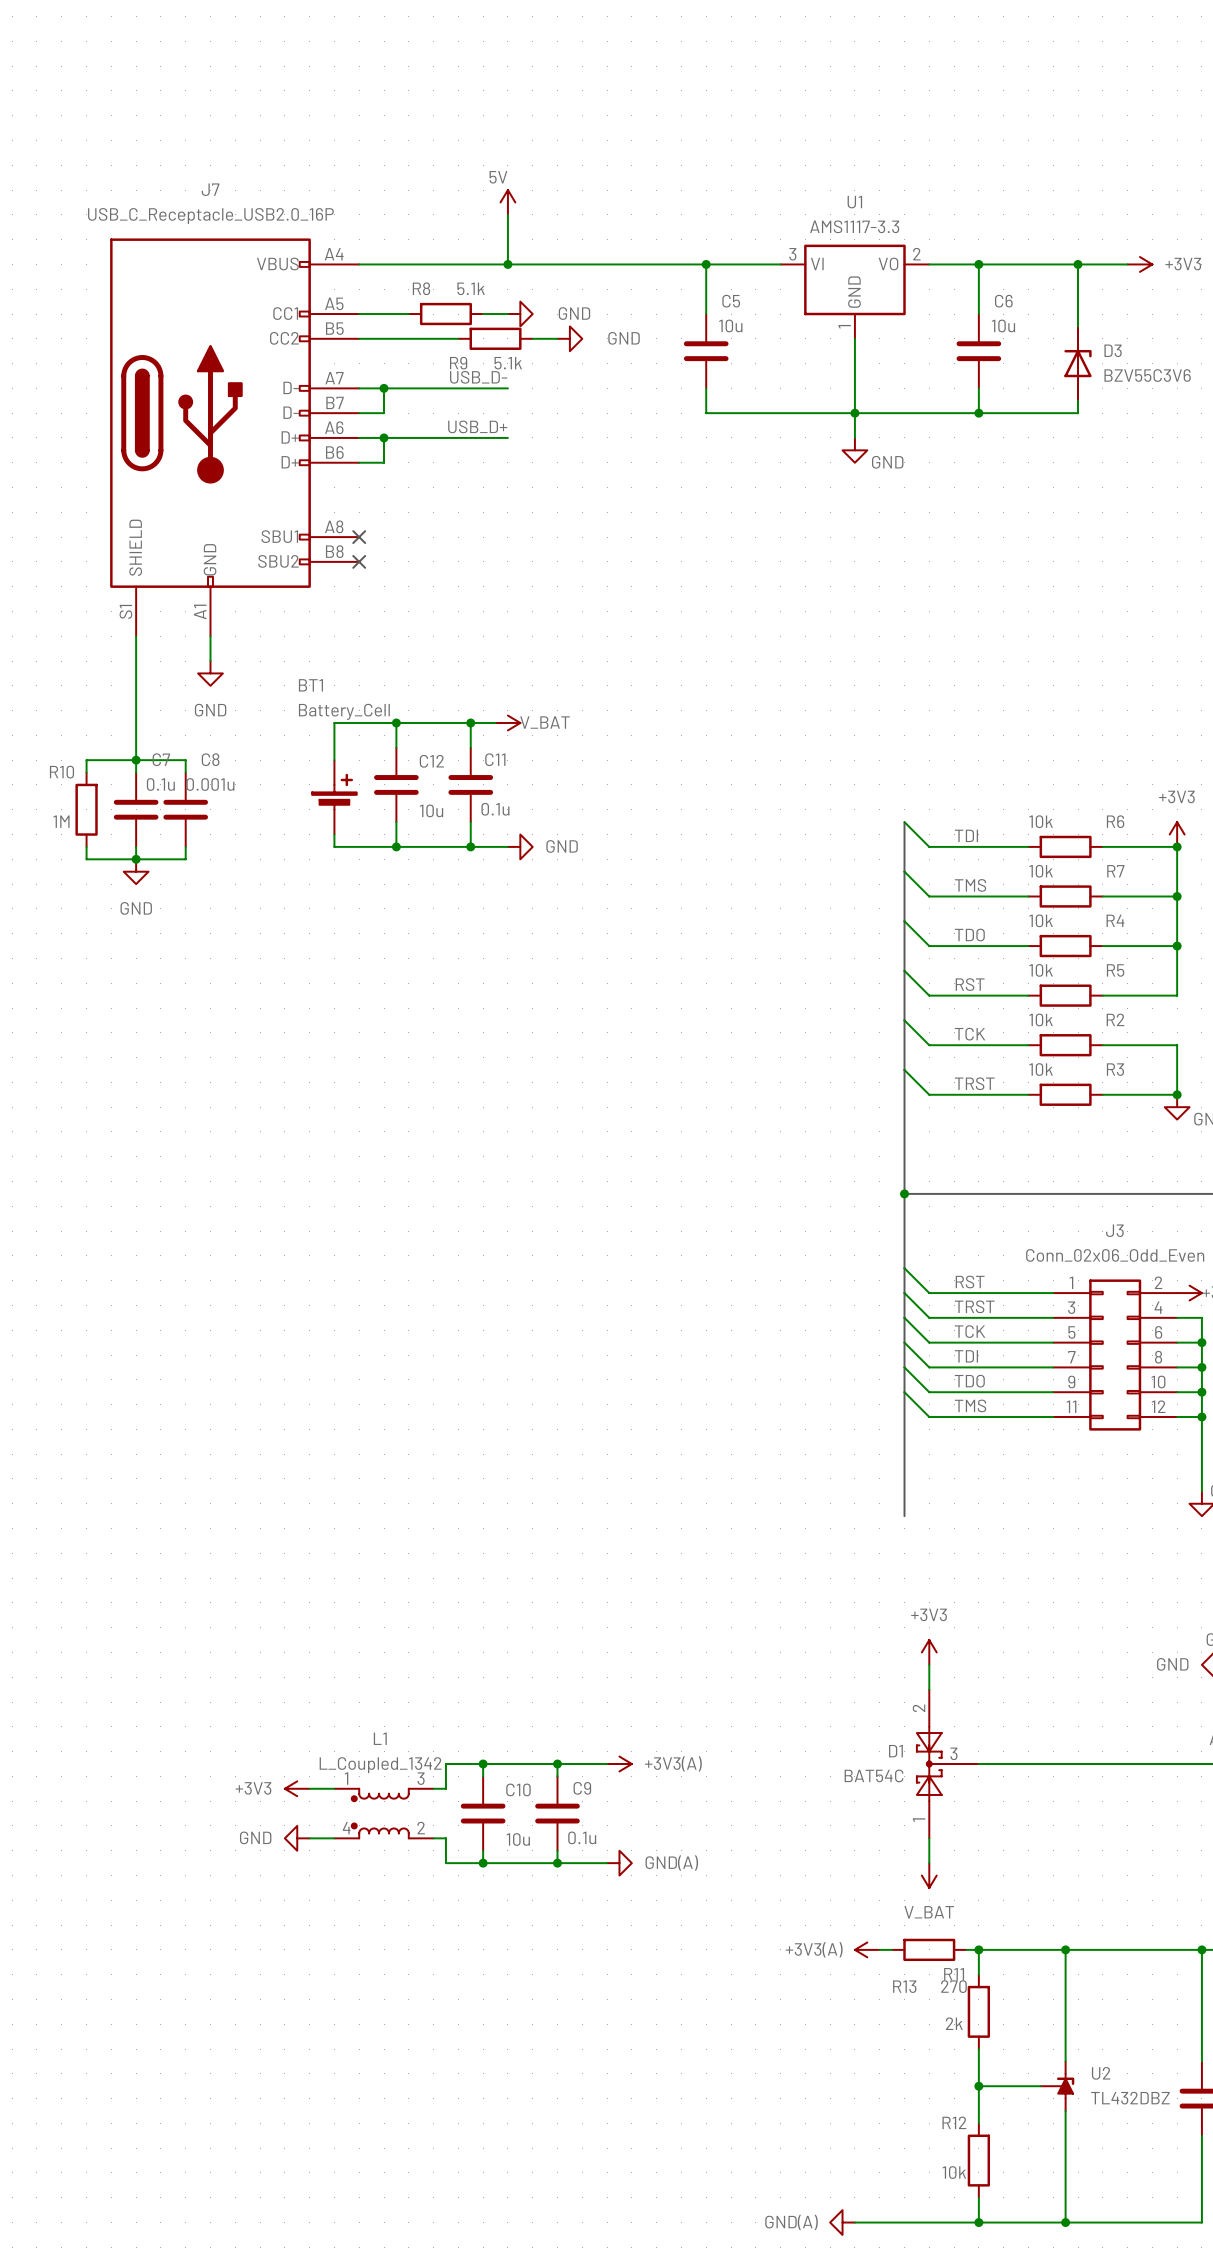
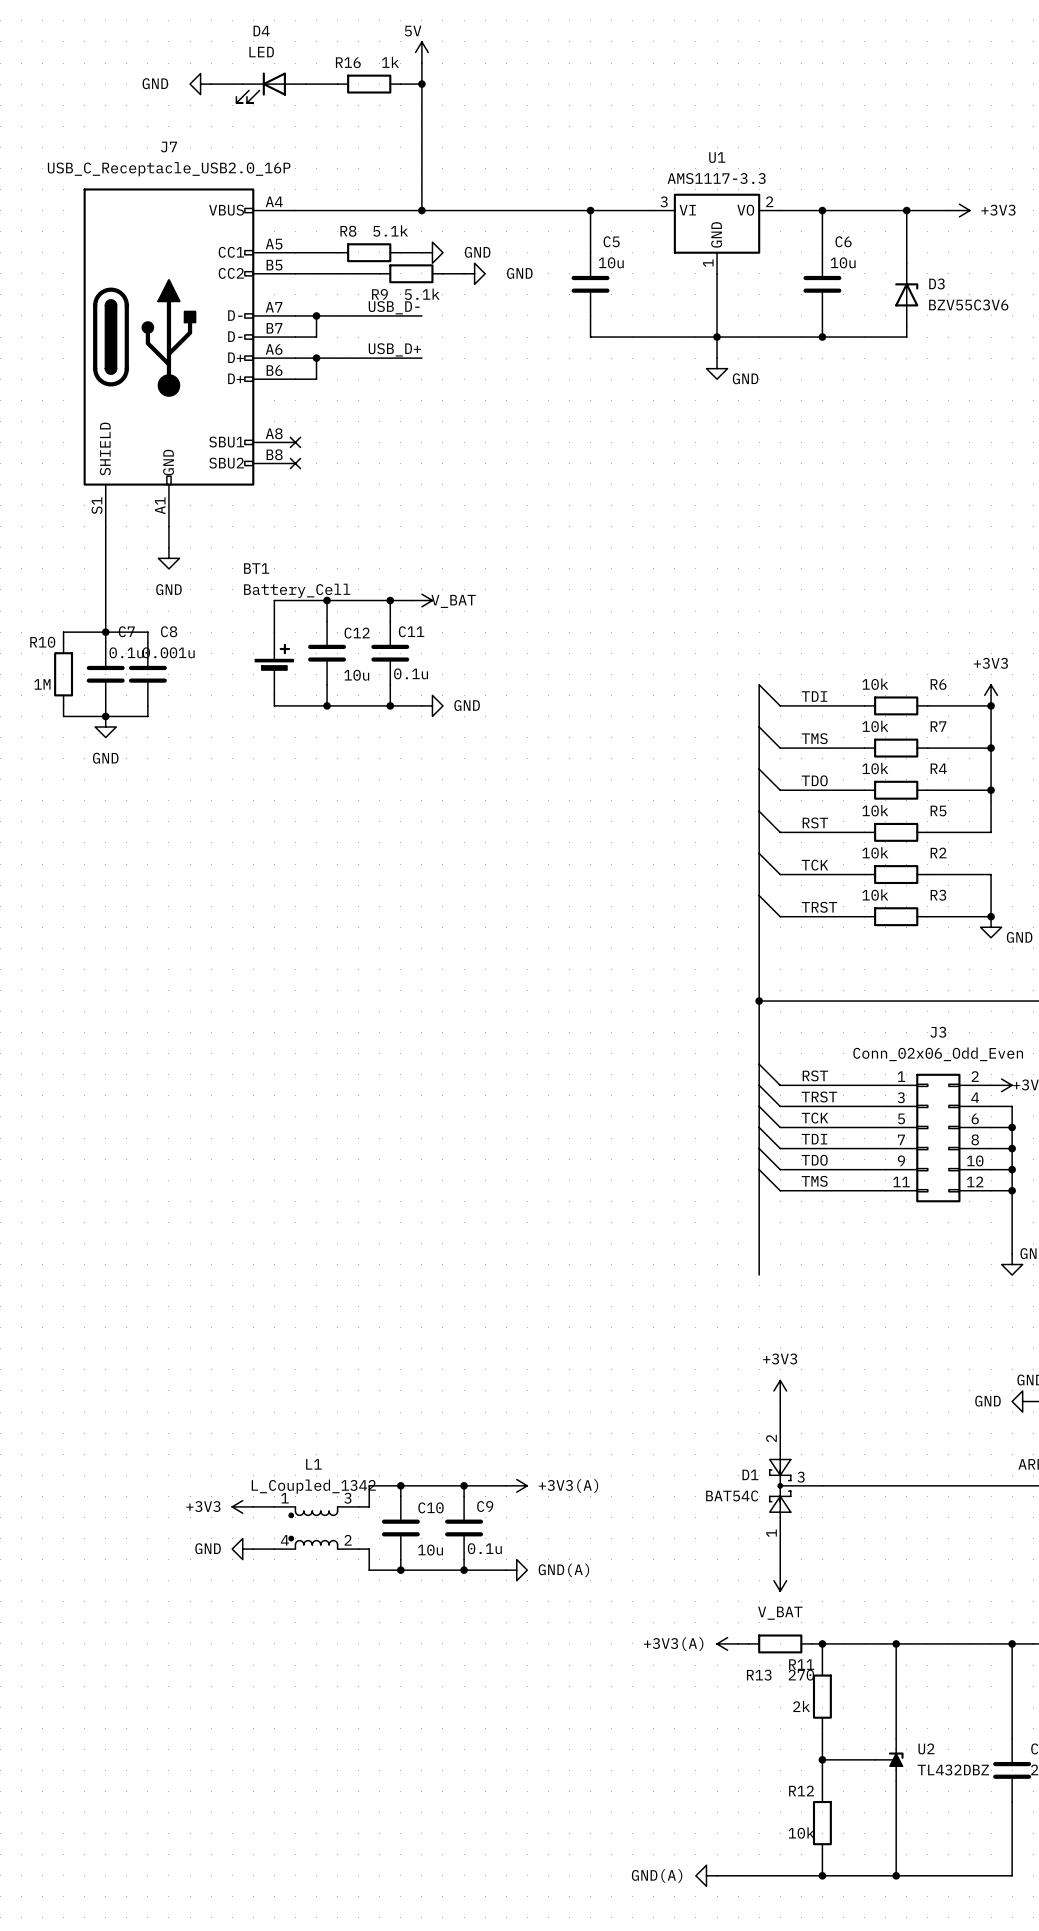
wire: none -> (421, 63) (421, 168)
power symbol: none -> GND (200, 84)
wire: none -> (211, 84) (242, 84)
wire: none -> (305, 84) (337, 84)
R16: none -> 1k (369, 84)
wire: none -> (400, 84) (421, 84)
junction: none -> (421, 84)
D4: none -> LED (271, 87)
power symbol position: 5V (507, 202) -> 5V (421, 52)

